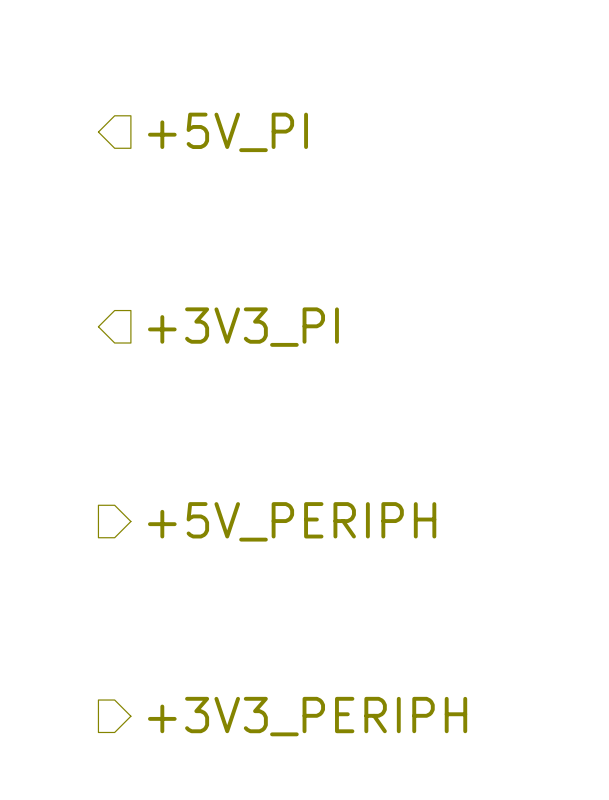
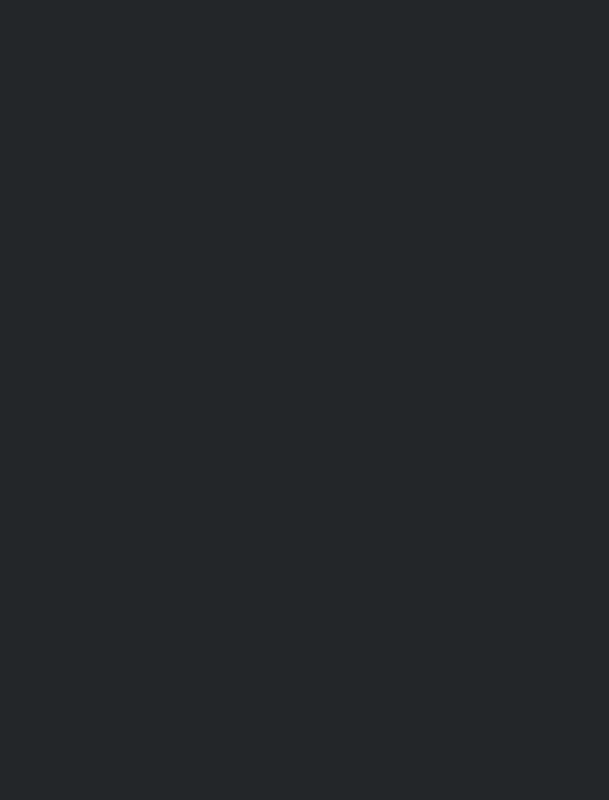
hierarchical label: +5V_PI (228, 132) -> none
hierarchical label: +3V3_PI (243, 327) -> none
hierarchical label: +5V_PERIPH (292, 521) -> none
hierarchical label: +3V3_PERIPH (307, 716) -> none

